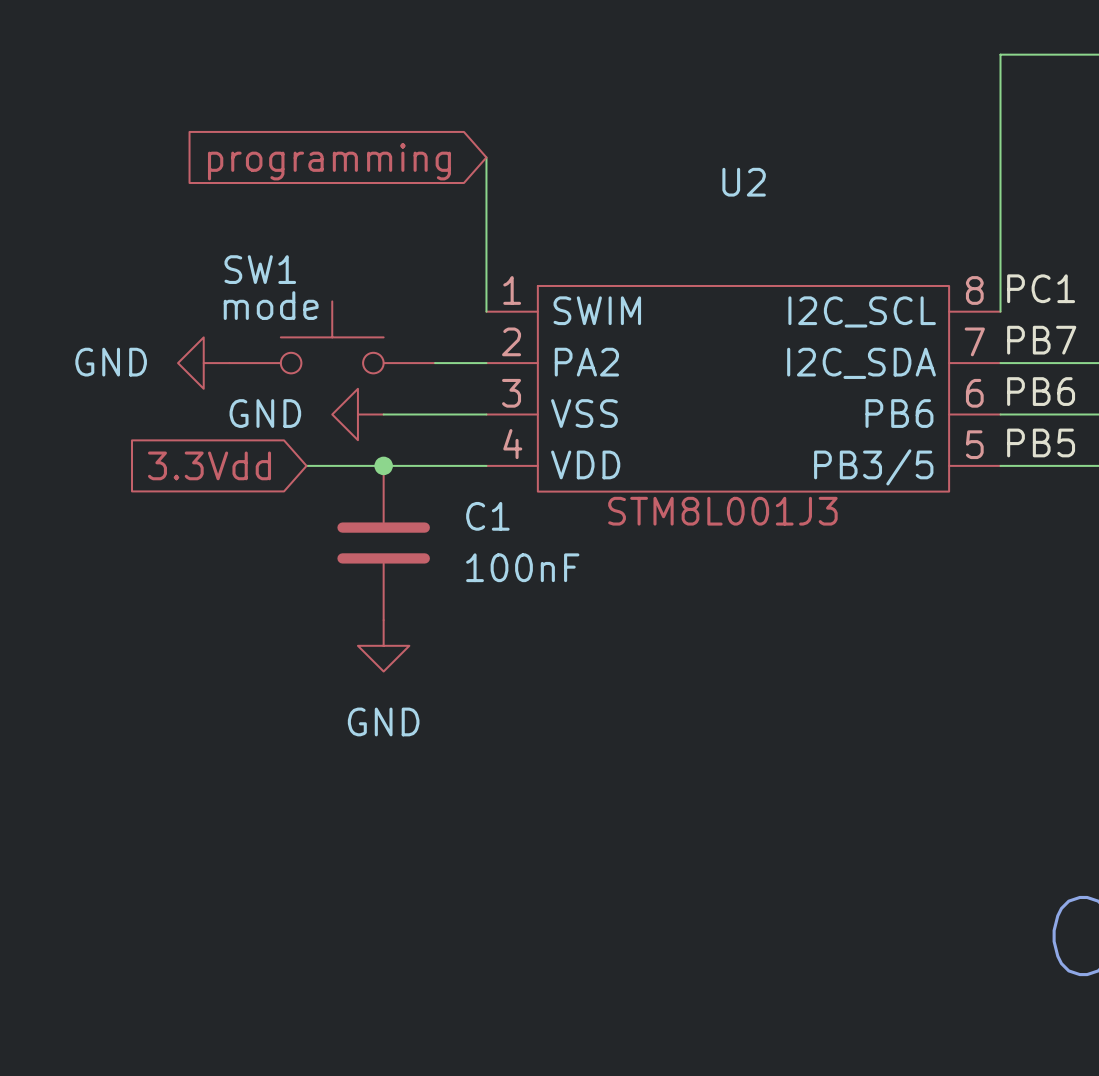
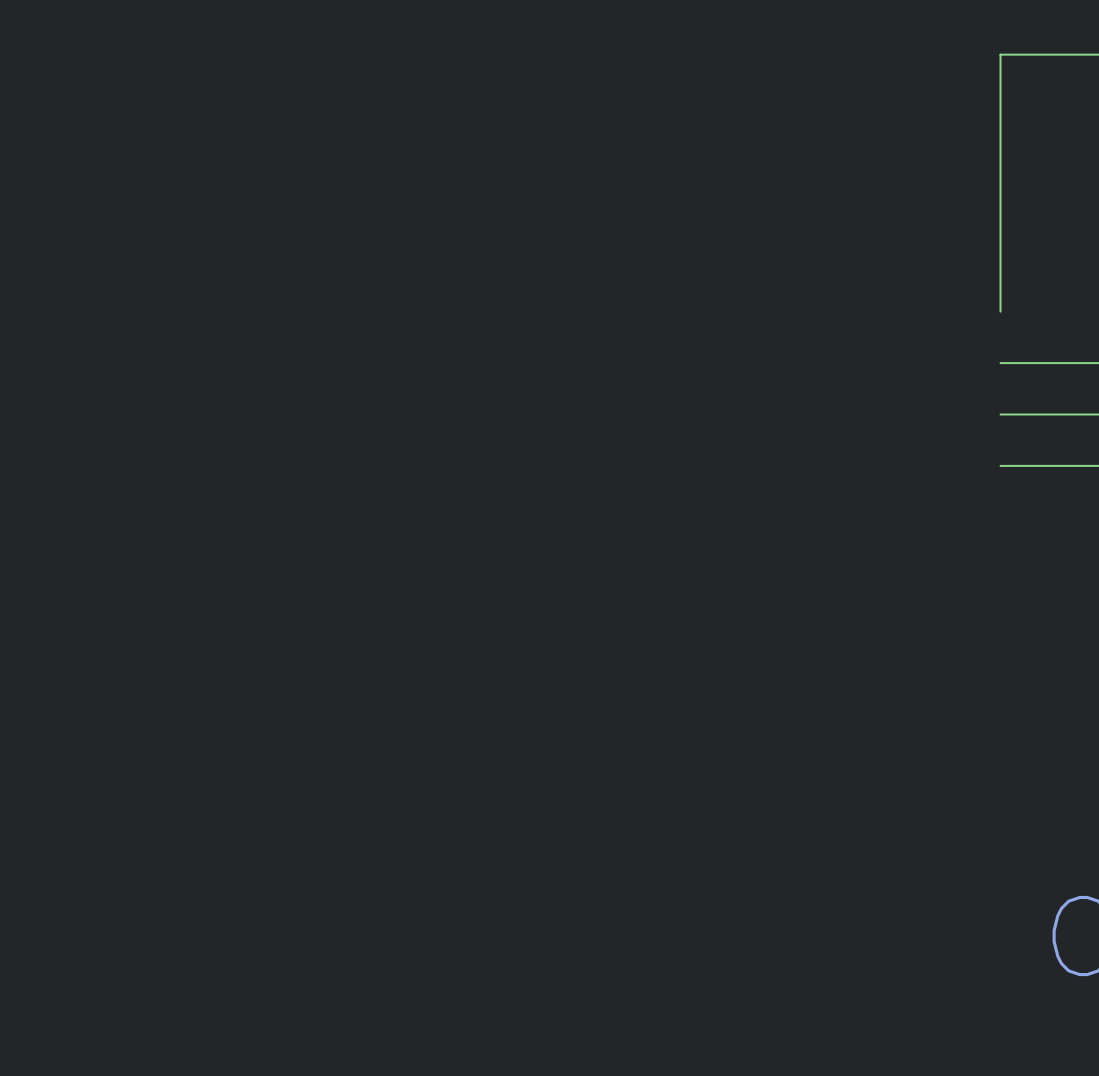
wire: (486, 157) (486, 311) -> none
global label: programming (329, 161) -> none
label: PC1 (1041, 288) -> none
SW1: mode (332, 337) -> none
label: PB7 (1041, 340) -> none
power symbol: GND (203, 363) -> none
wire: (435, 363) (486, 363) -> none
U2: (743, 388) -> none
label: PB6 (1041, 391) -> none
power symbol: GND (357, 414) -> none
wire: (383, 414) (486, 414) -> none
label: PB5 (1041, 442) -> none
global label: 3.3Vdd (209, 465) -> none
wire: (306, 465) (486, 465) -> none
junction: (383, 465) -> none
C1: 100nF (383, 543) -> none
power symbol: GND (383, 645) -> none

